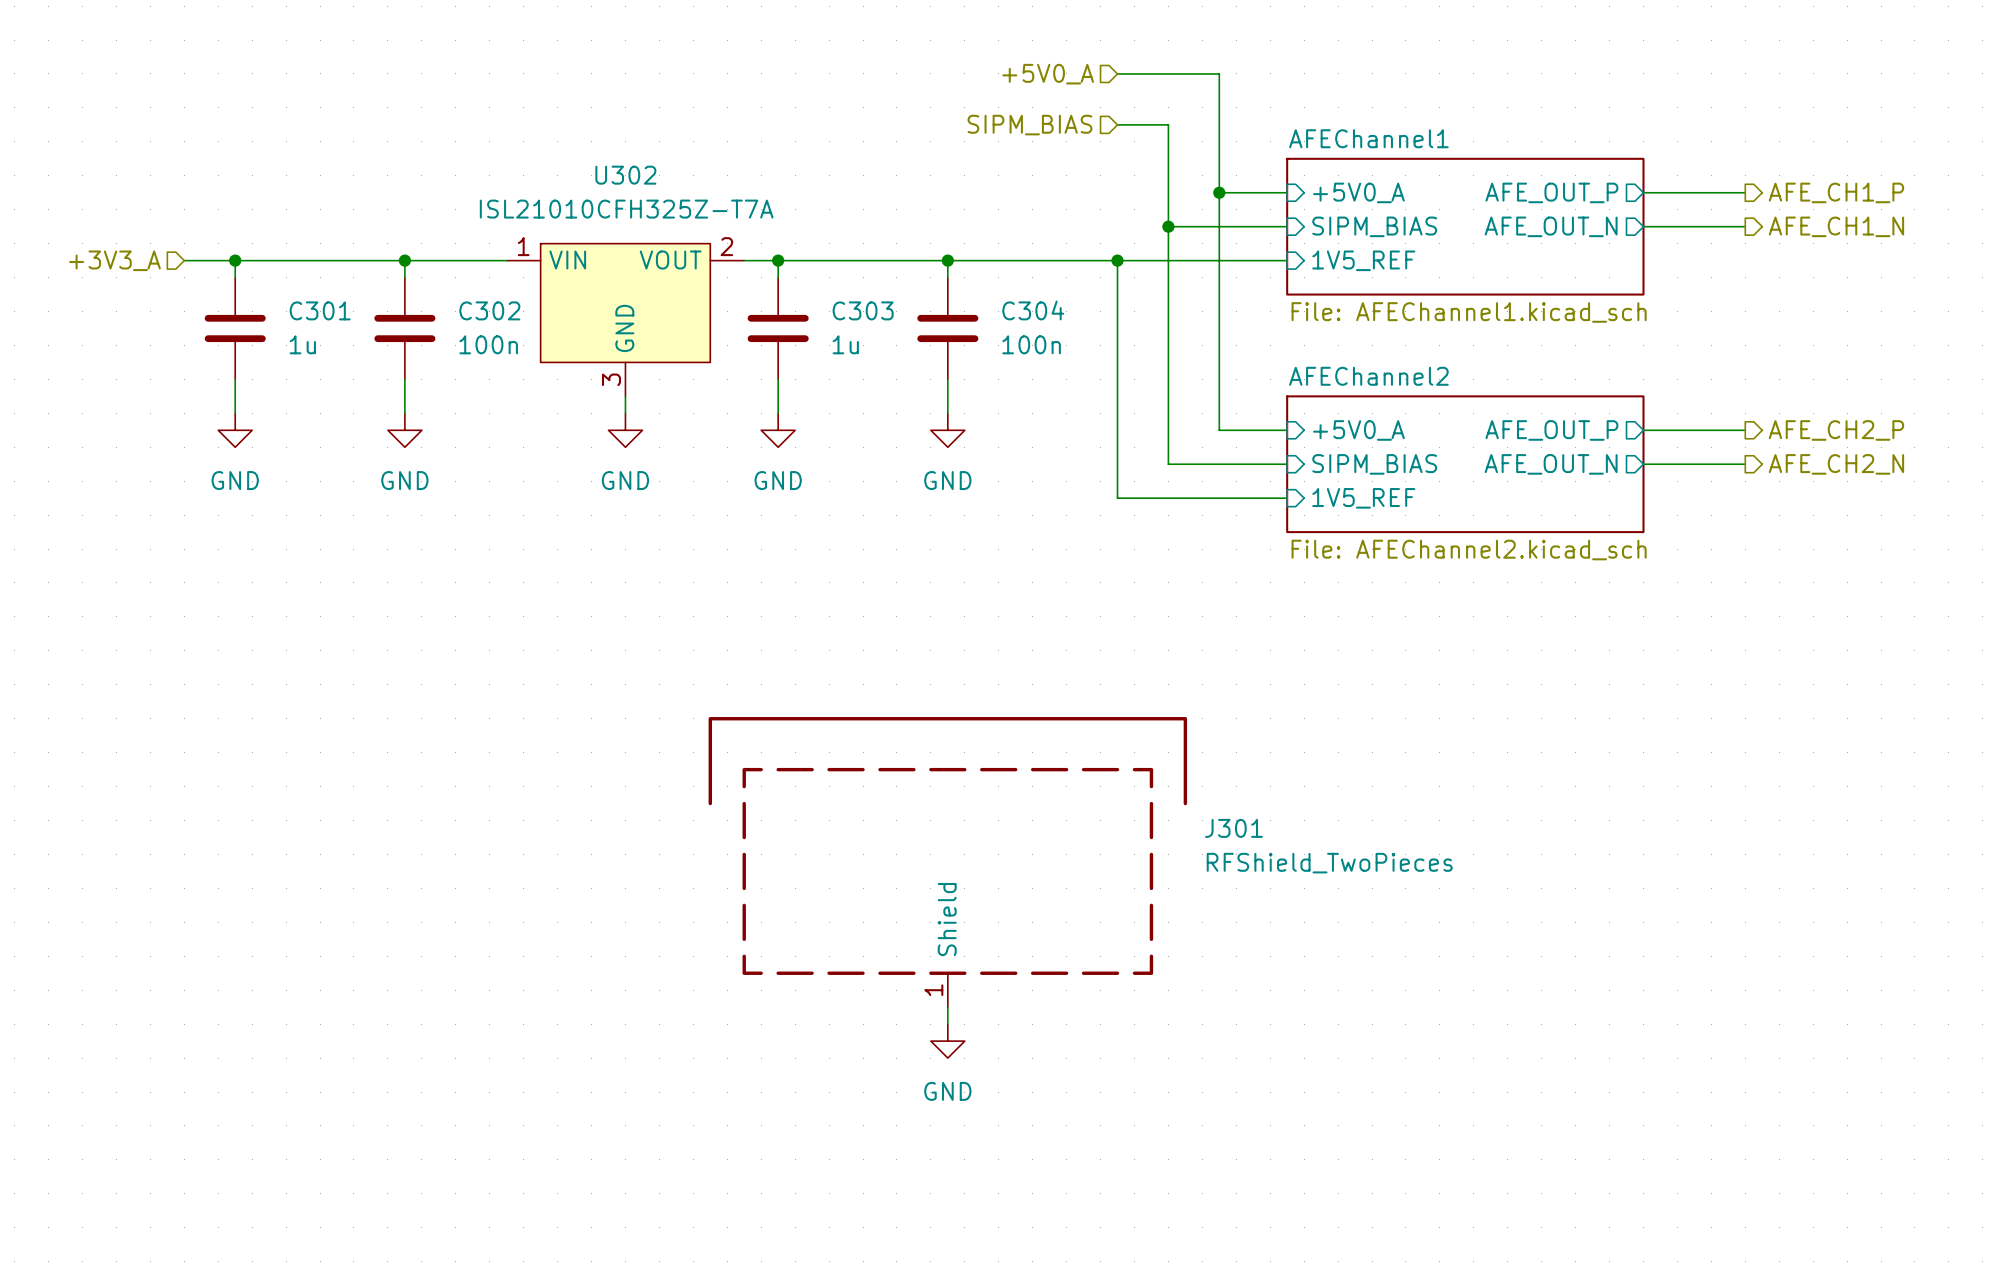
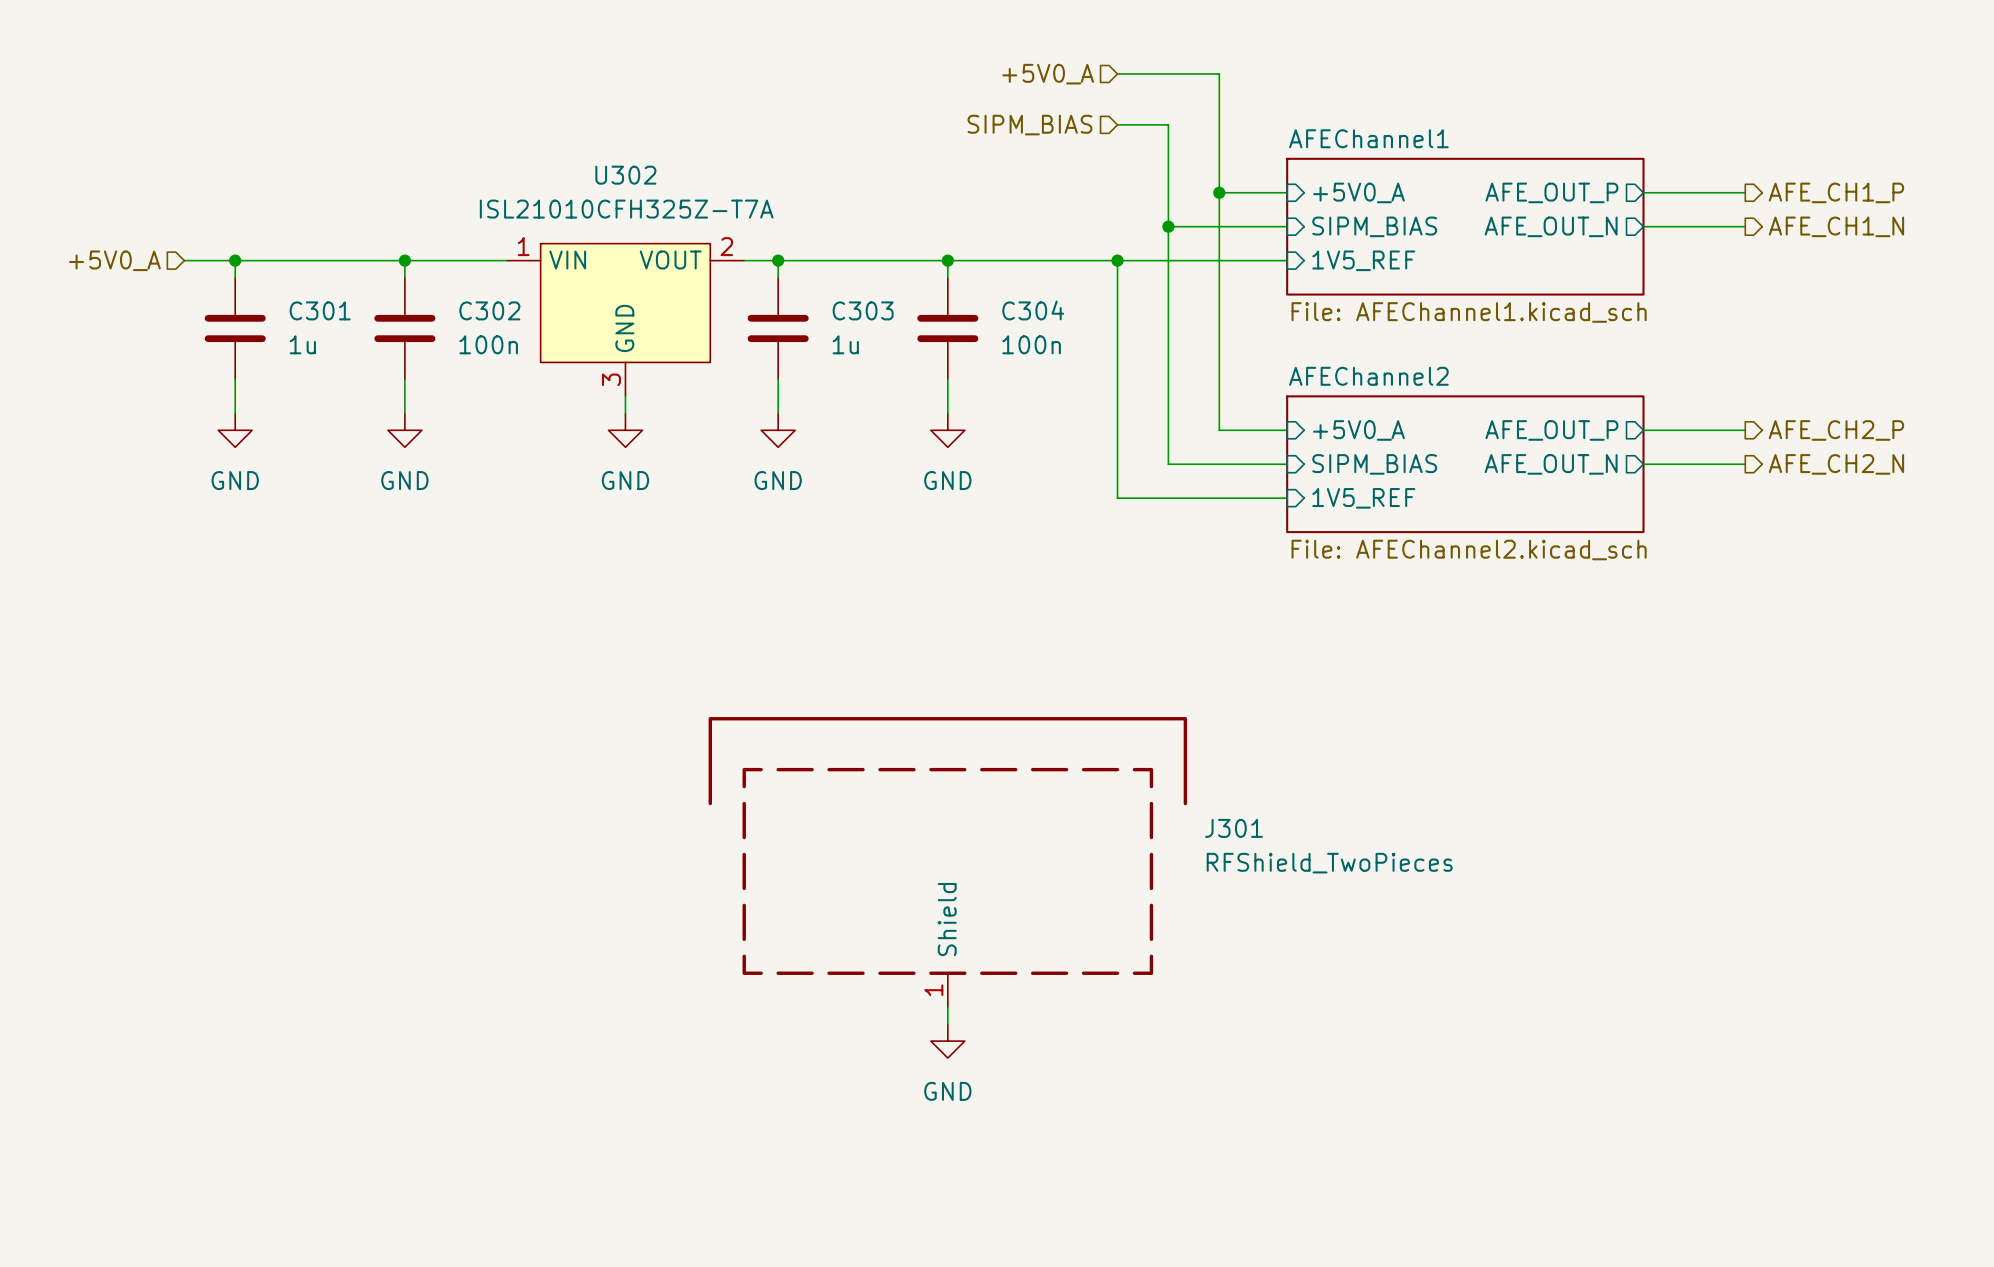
hierarchical label: +3V3_A (114, 260) -> +5V0_A (114, 260)

